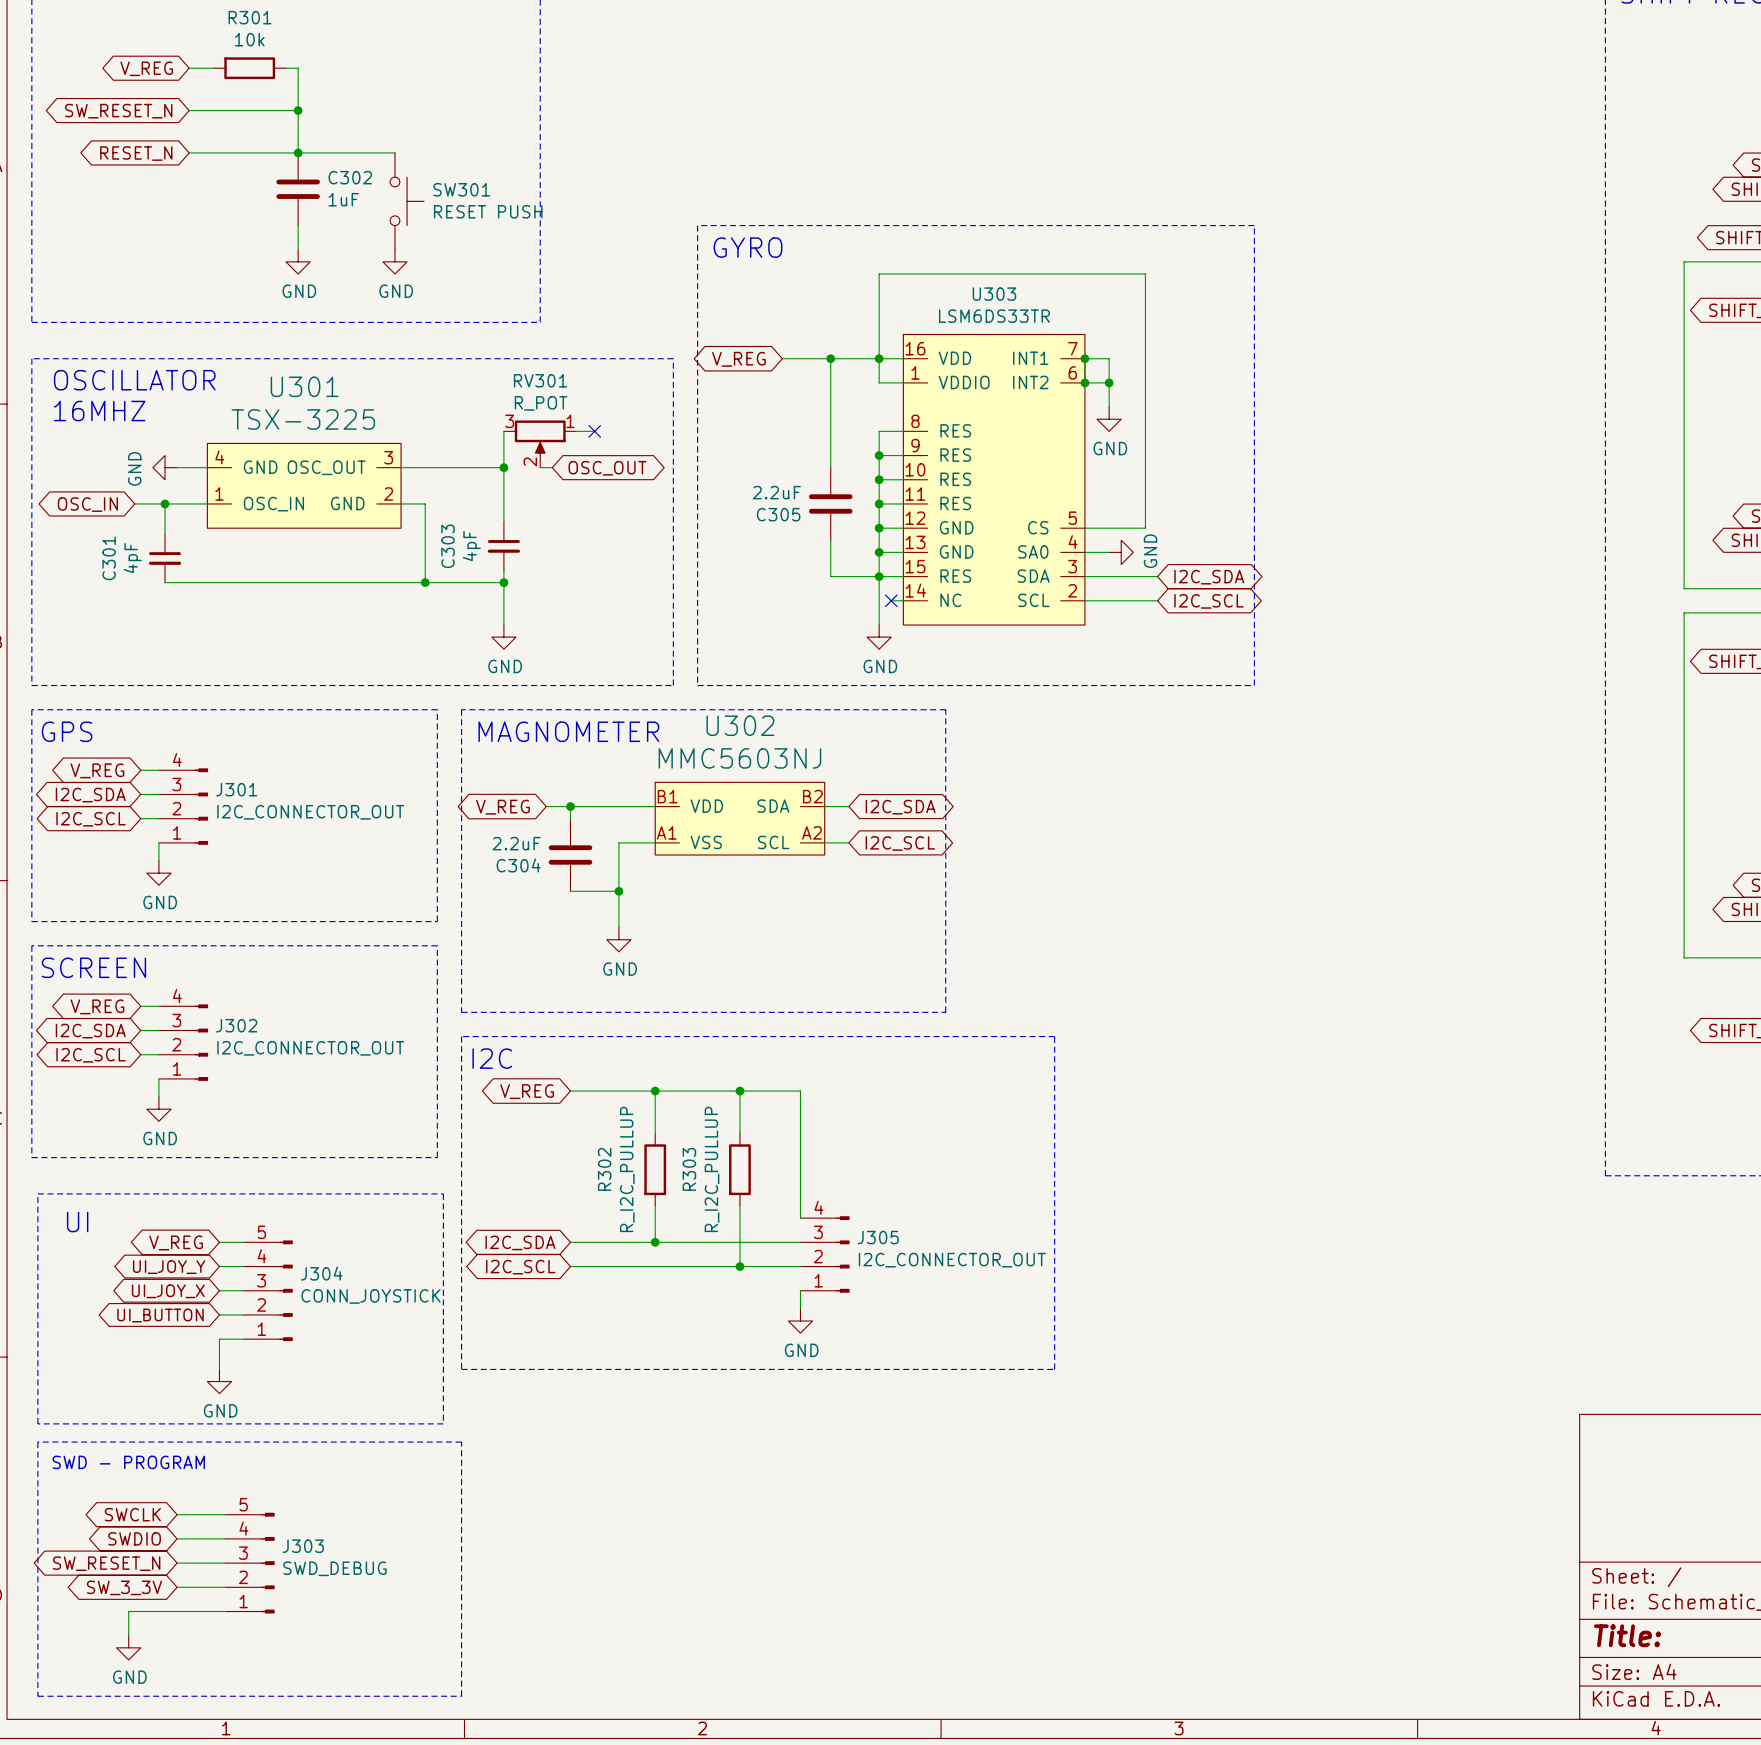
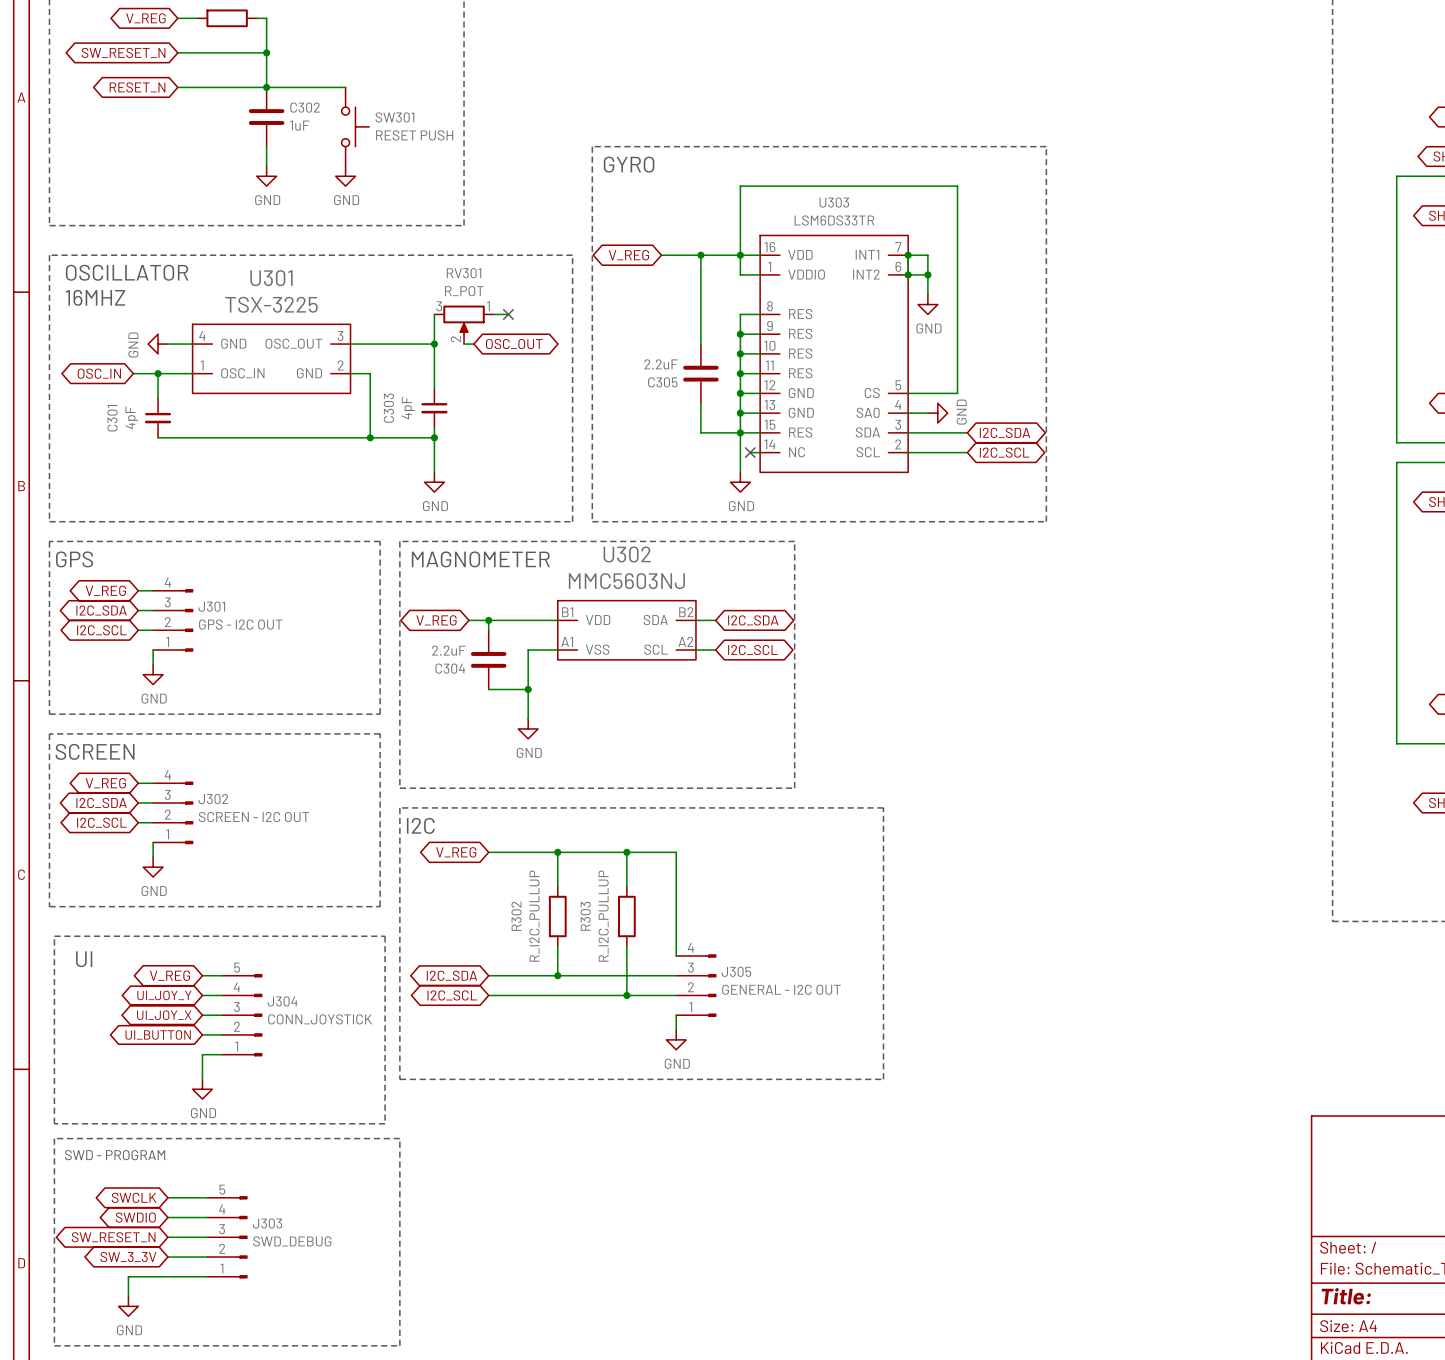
J301 value: I2C_CONNECTOR_OUT (310, 812) -> GPS - I2C OUT (240, 624)
J302 value: I2C_CONNECTOR_OUT (310, 1048) -> SCREEN - I2C OUT (254, 817)
J305 value: I2C_CONNECTOR_OUT (952, 1260) -> GENERAL - I2C OUT (781, 989)

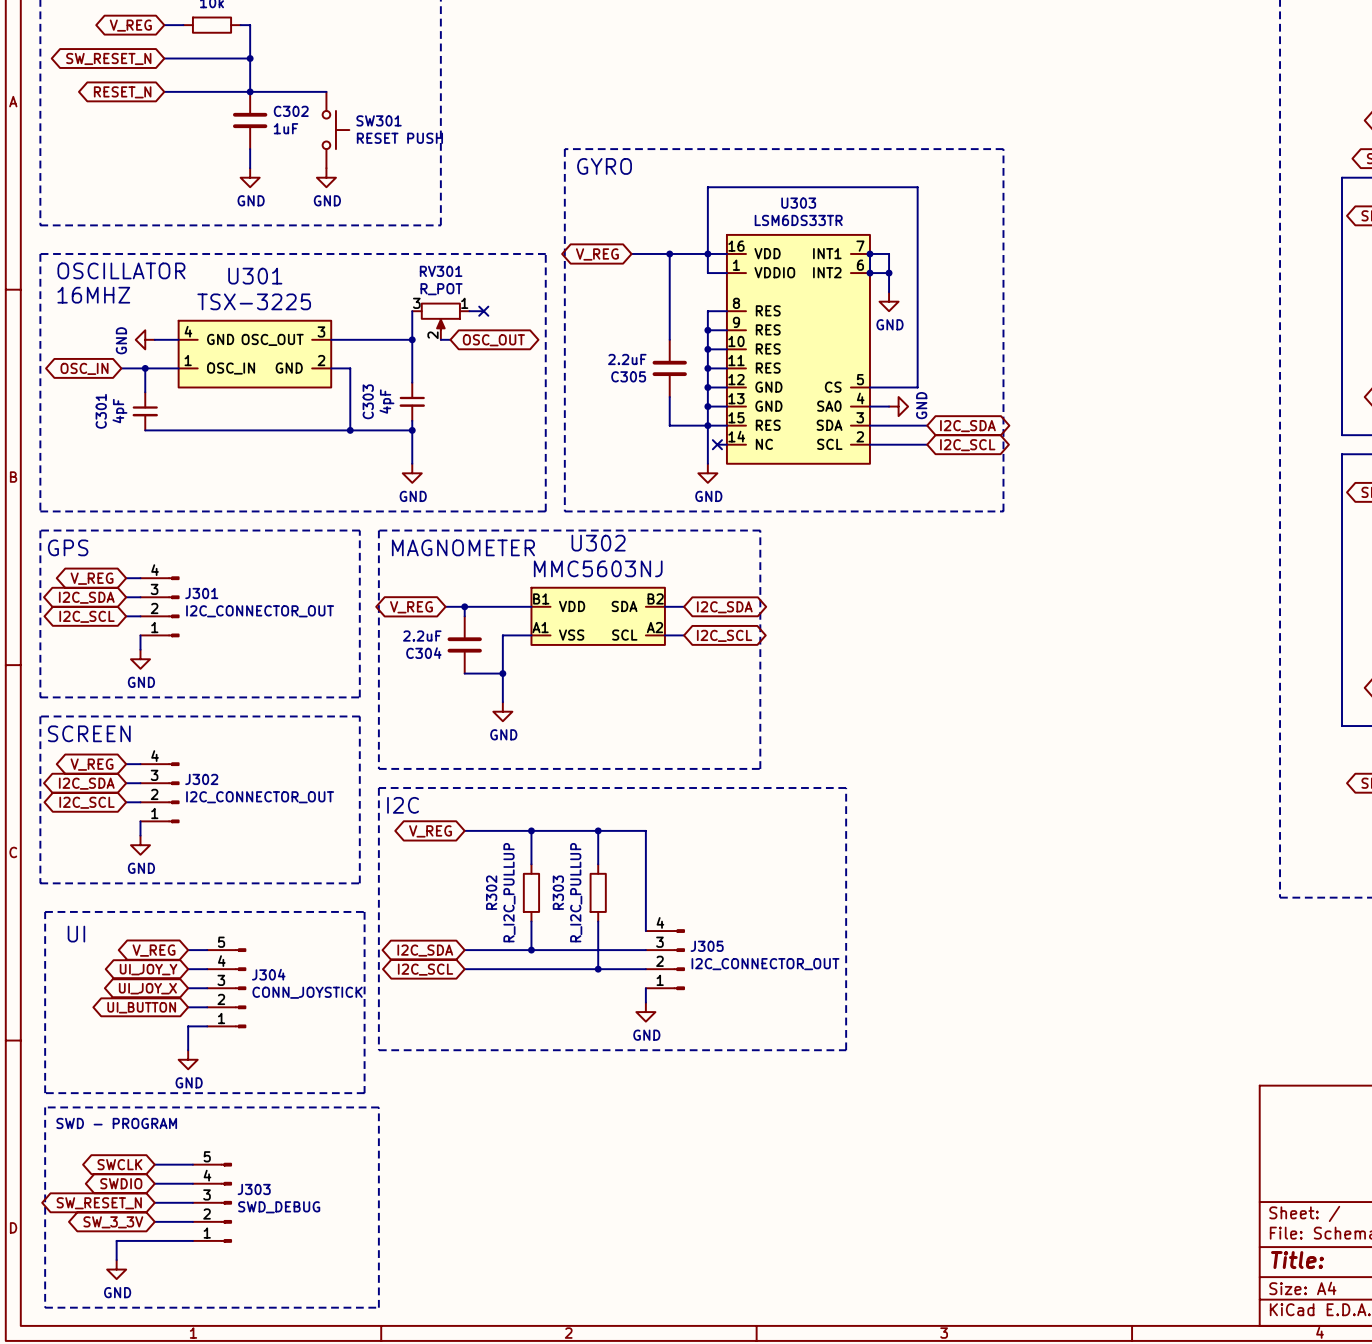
J301 value: GPS - I2C OUT (240, 624) -> I2C_CONNECTOR_OUT (260, 611)
J302 value: SCREEN - I2C OUT (254, 817) -> I2C_CONNECTOR_OUT (260, 797)
J305 value: GENERAL - I2C OUT (781, 989) -> I2C_CONNECTOR_OUT (765, 964)

